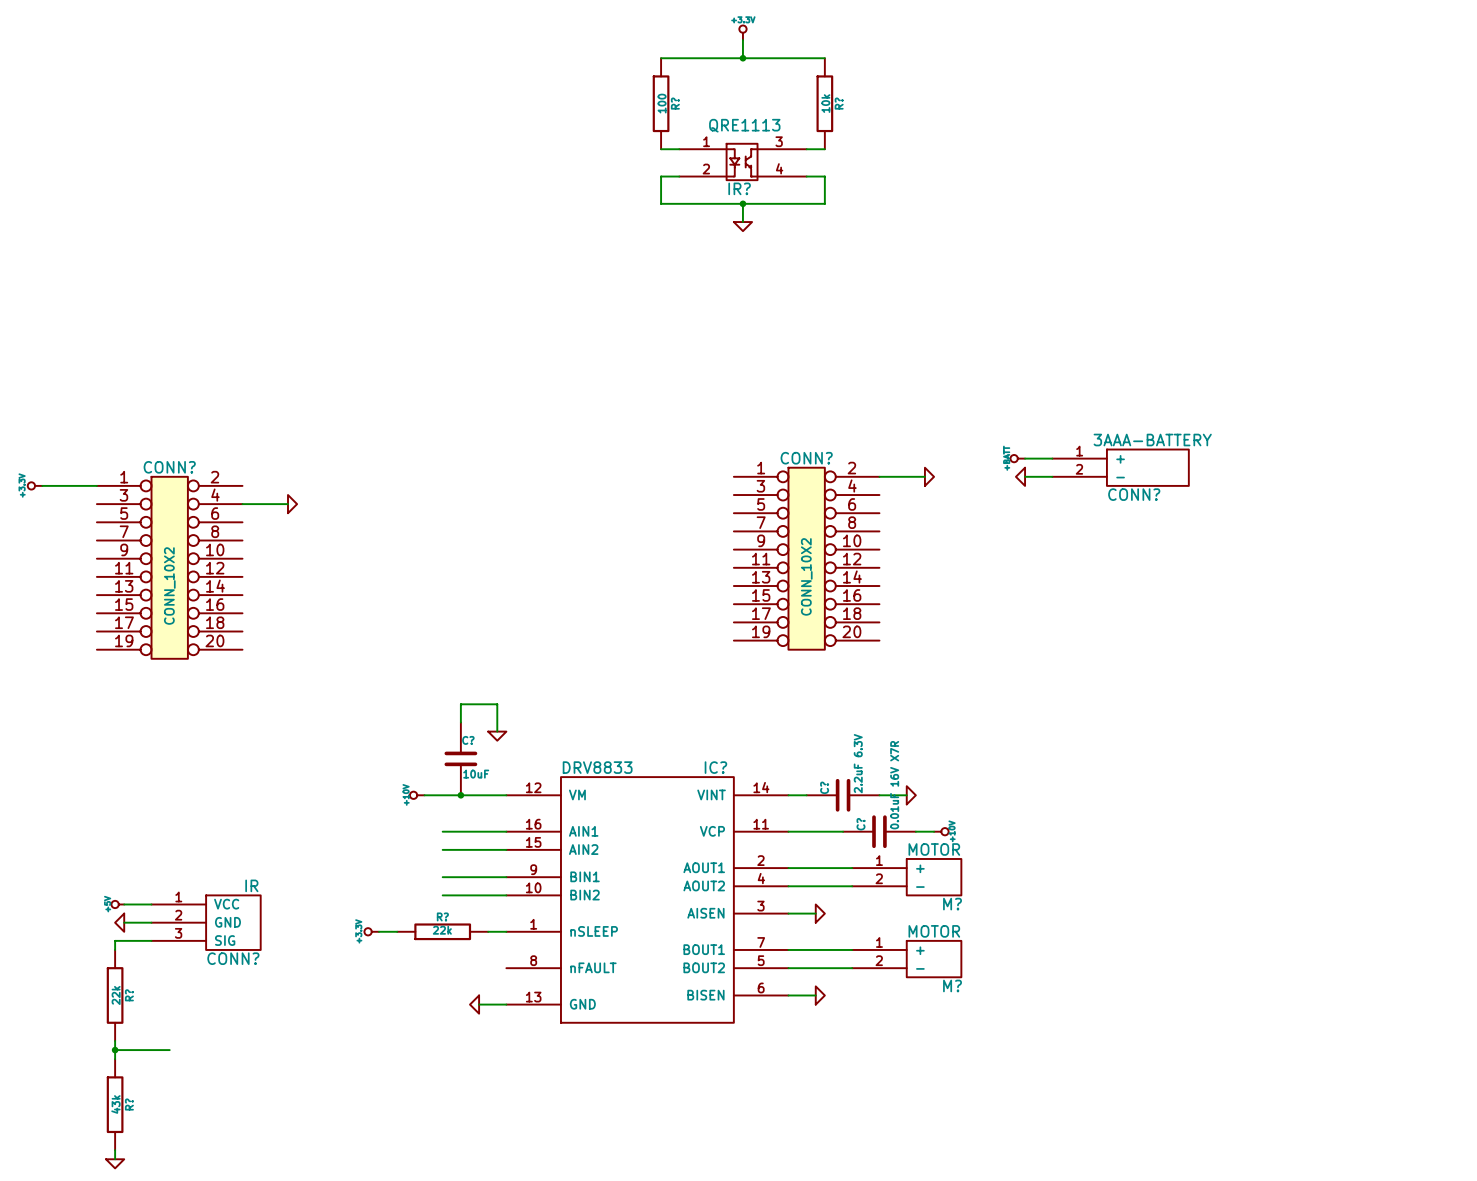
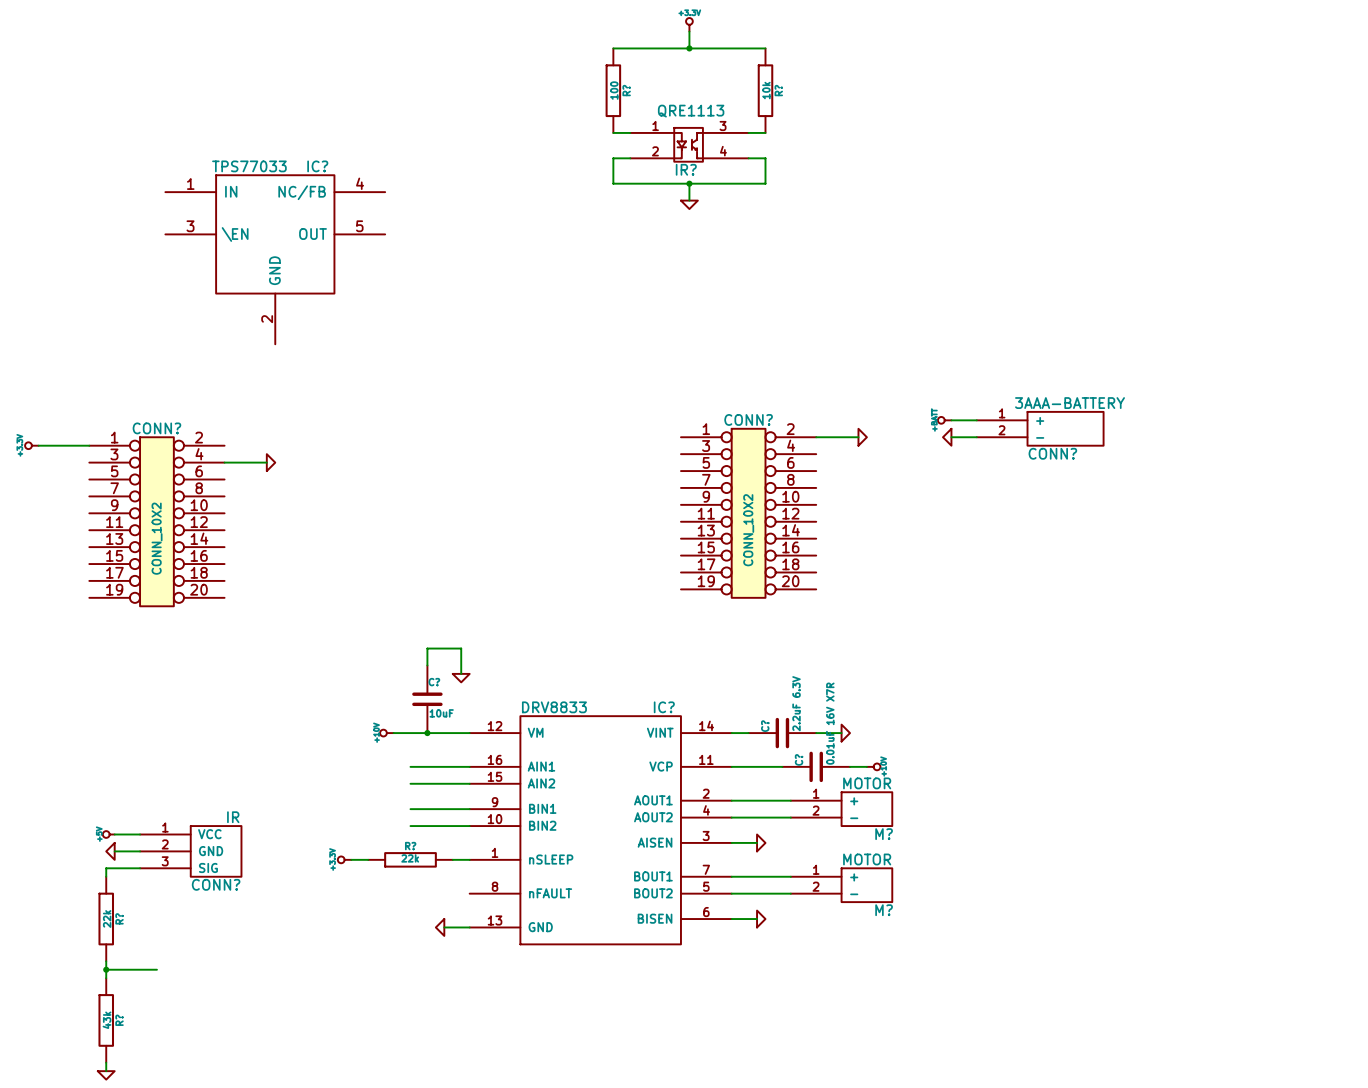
IC?: none -> TPS77033 (275, 259)

